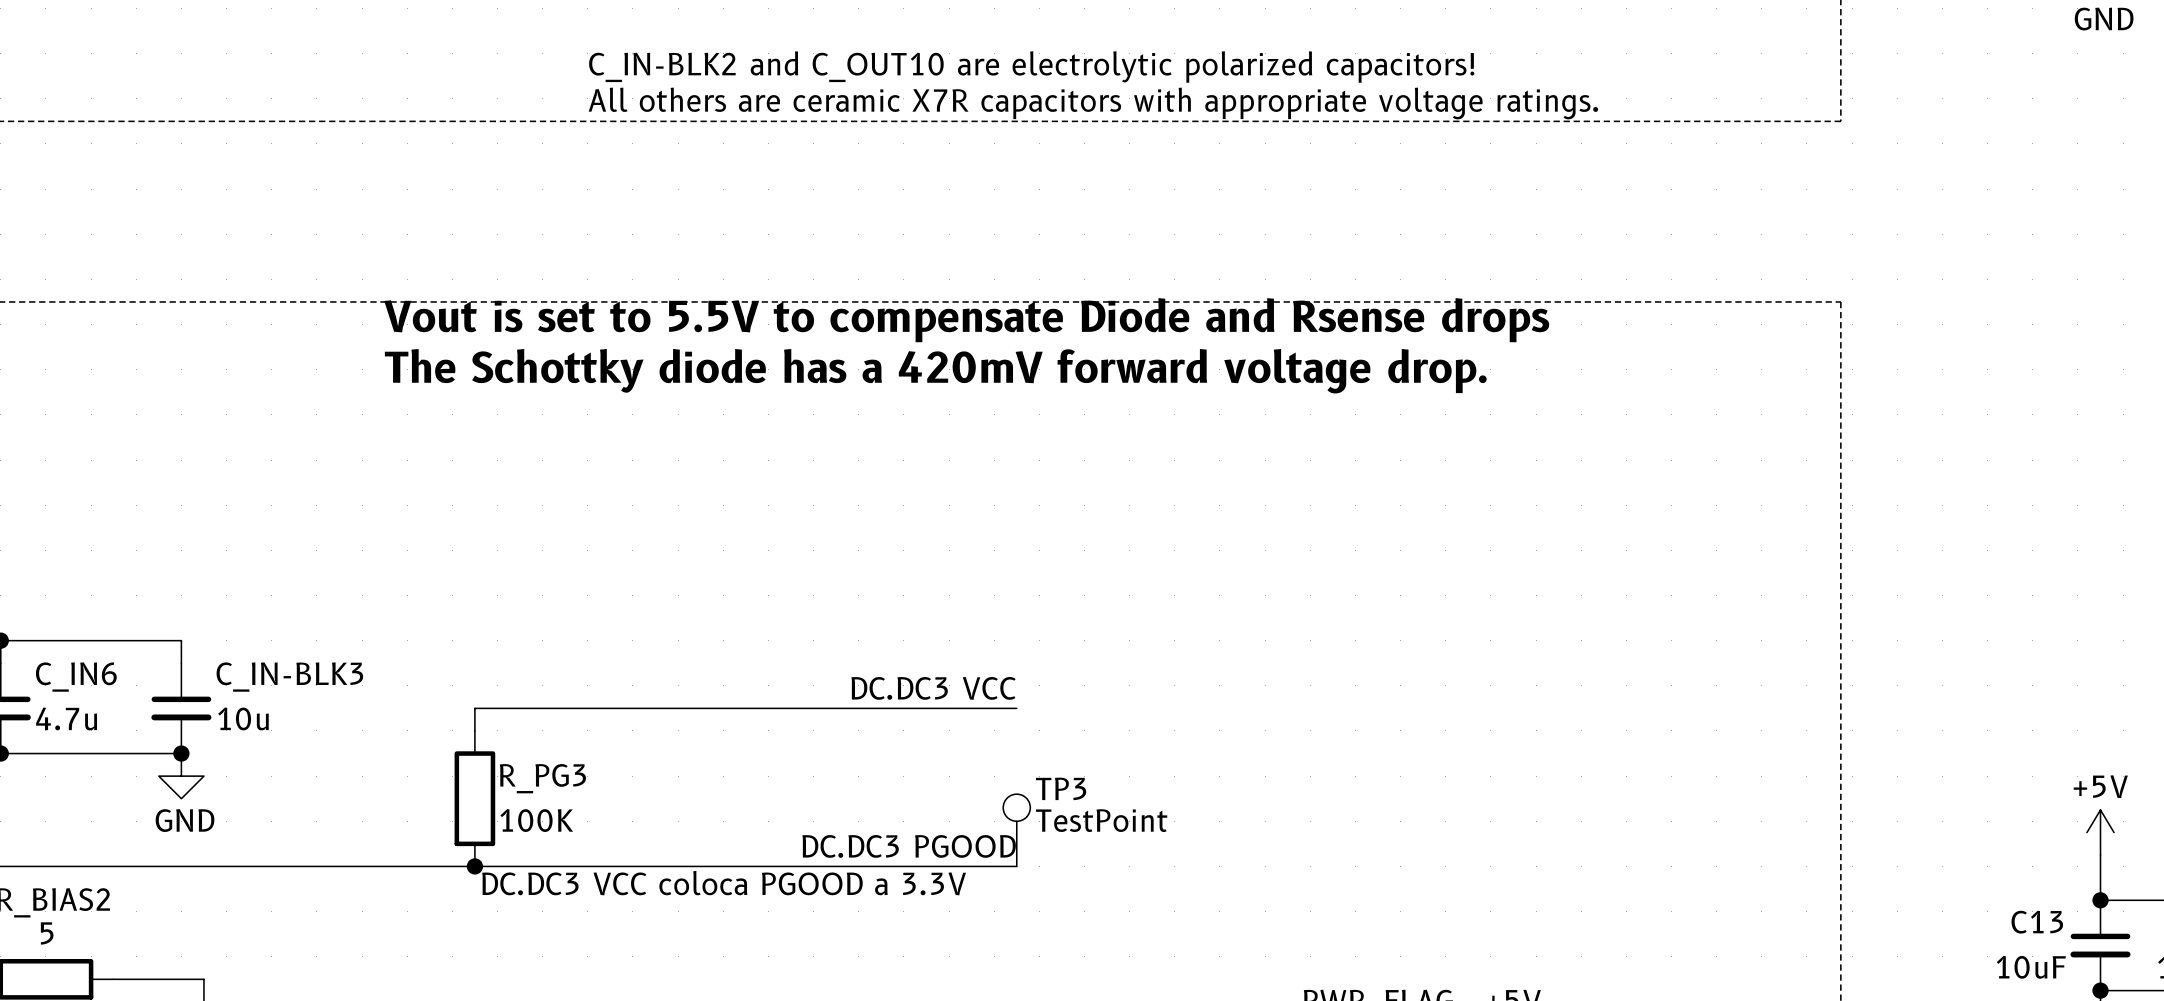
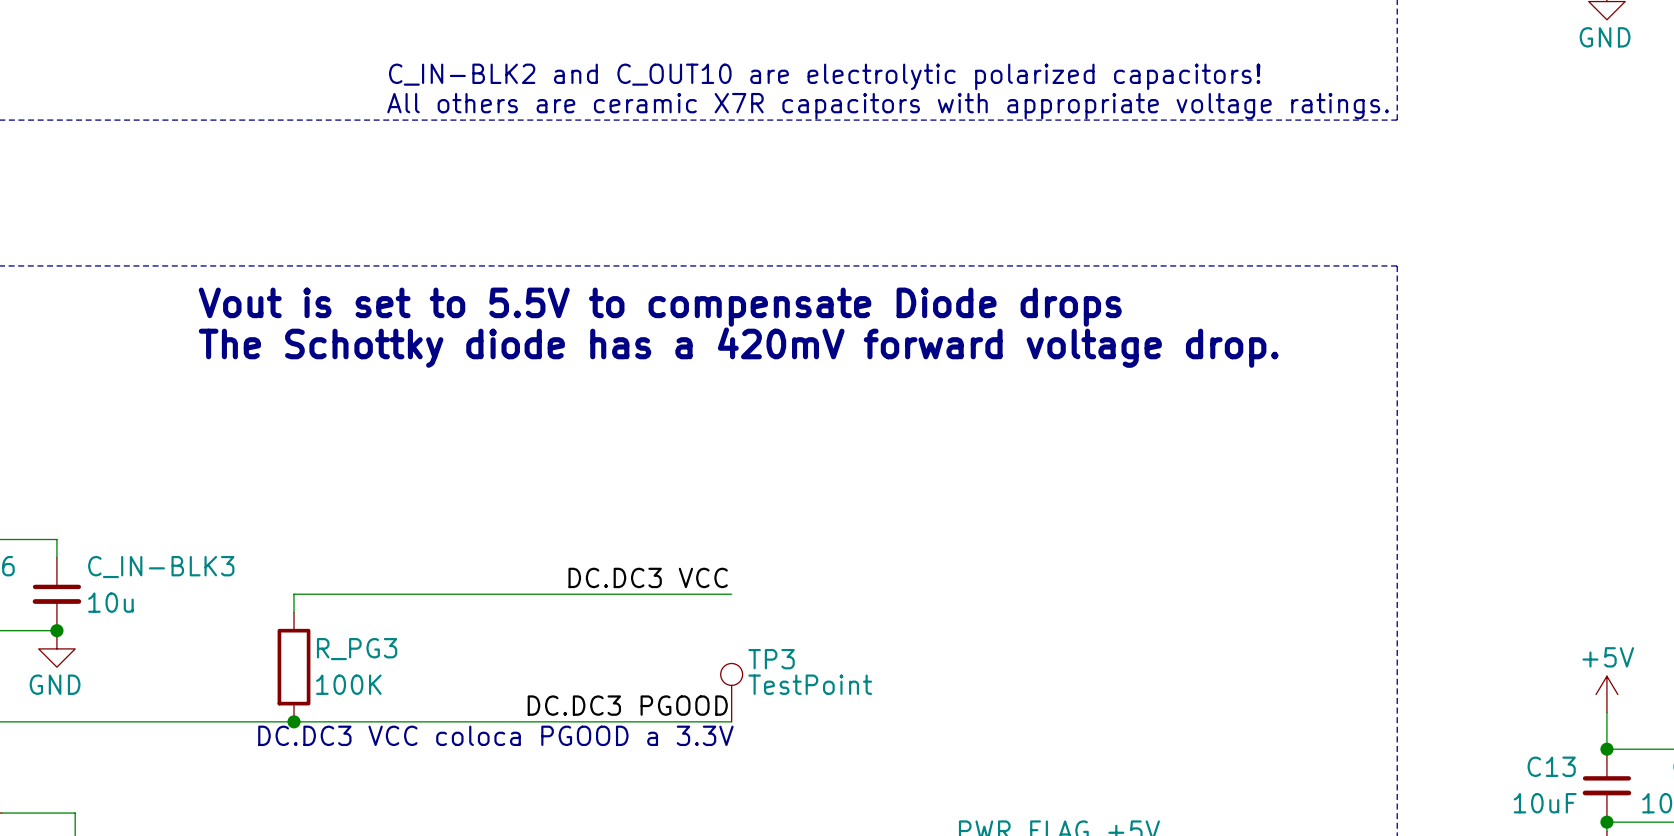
text: Vout is set to 5.5V to compensate Diode and Rsense drops (966, 320) -> Vout is set to 5.5V to compensate Diode drops (660, 307)
text position: The Schottky diode has a 420mV forward voltage drop. (935, 371) -> The Schottky diode has a 420mV forward voltage drop. (738, 347)

